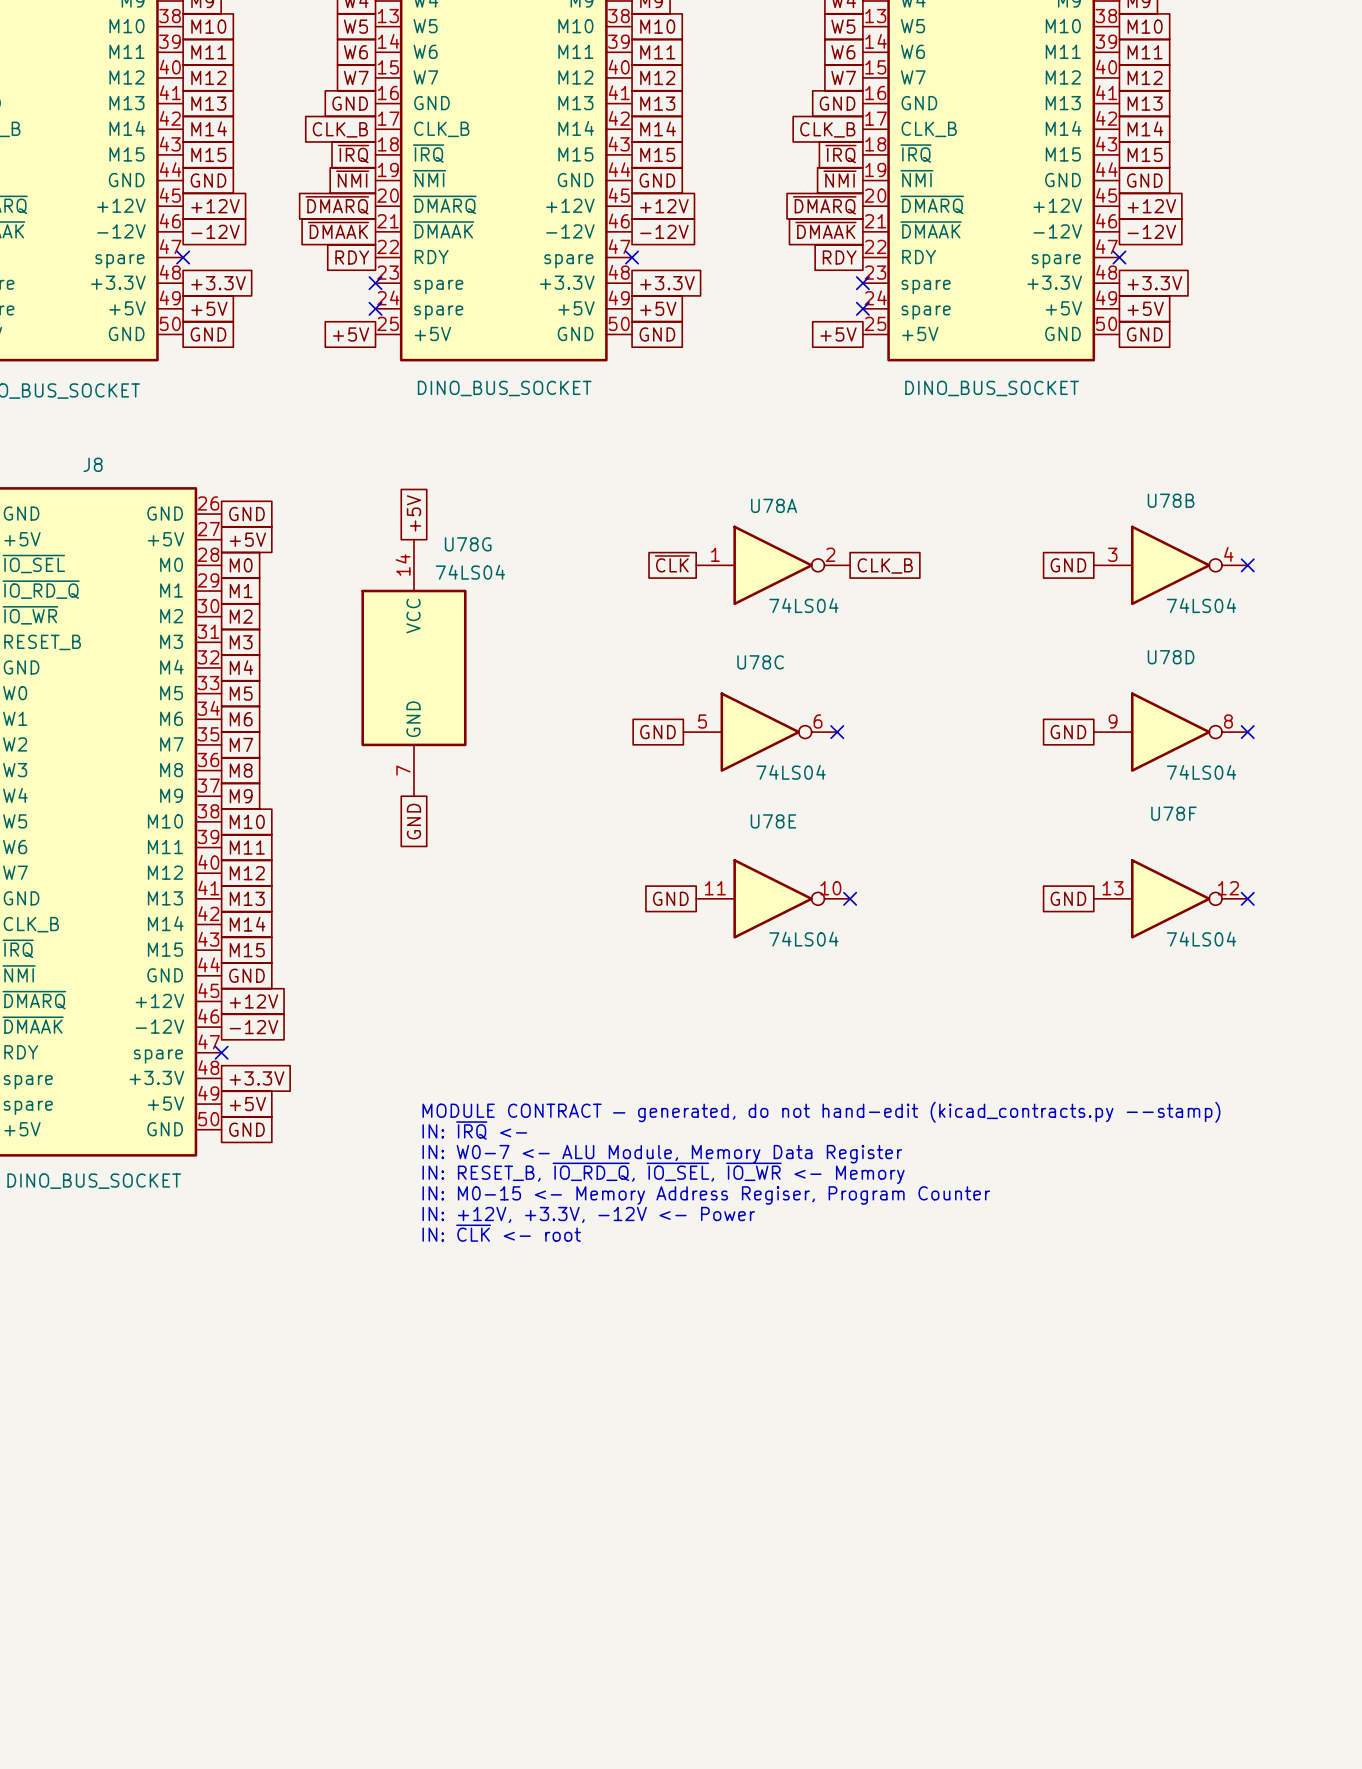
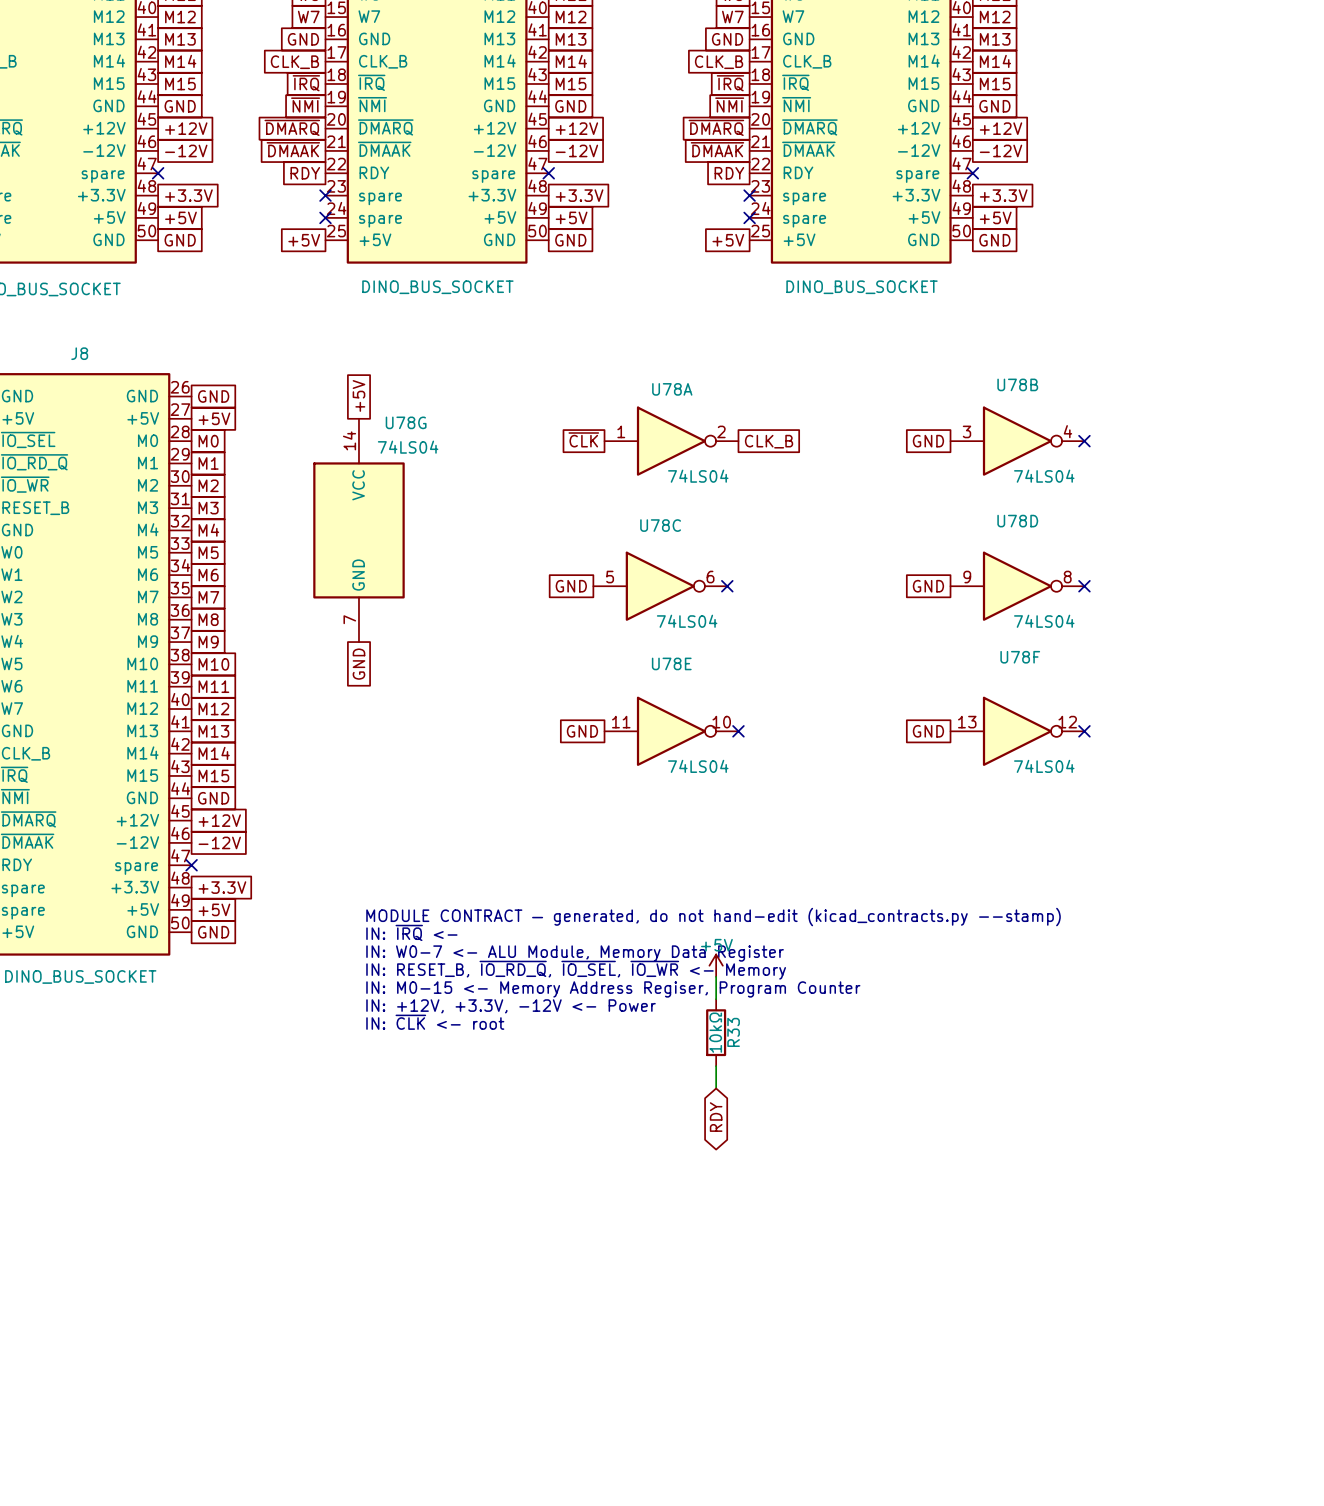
power symbol: none -> +5V (716, 965)
wire: none -> (716, 976) (716, 999)
R33: none -> 10kΩ (716, 1032)
wire: none -> (716, 1066) (716, 1088)
global label: none -> RDY (716, 1117)

